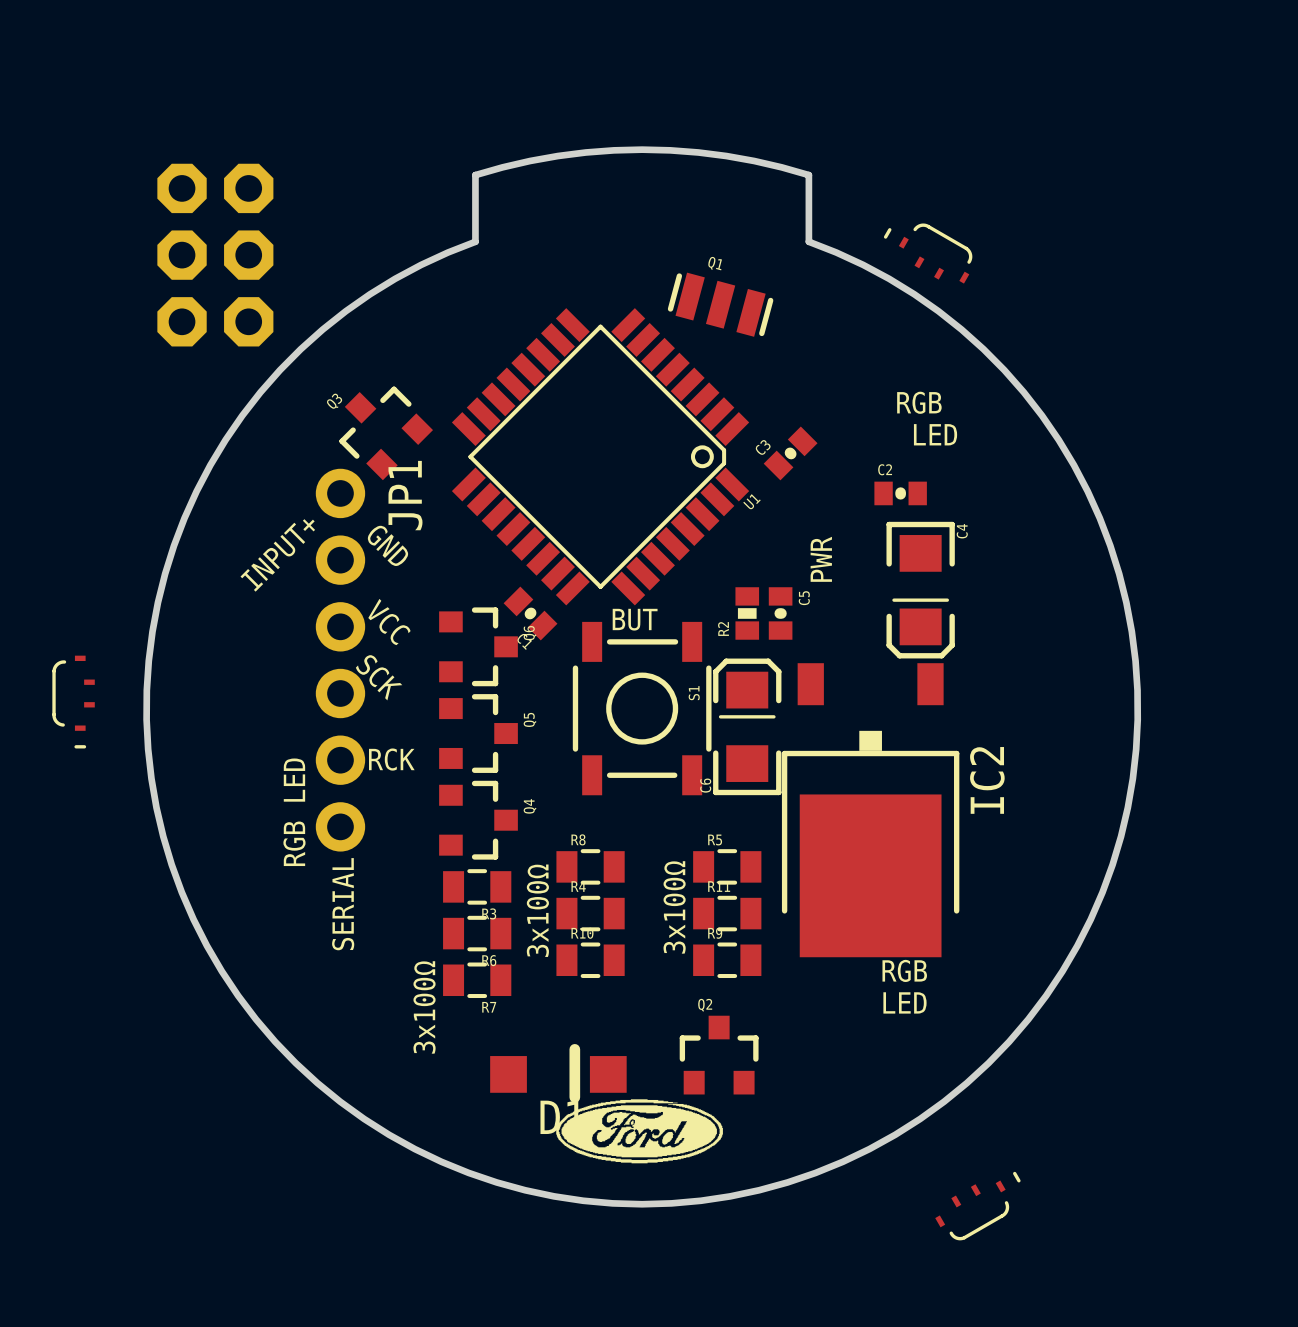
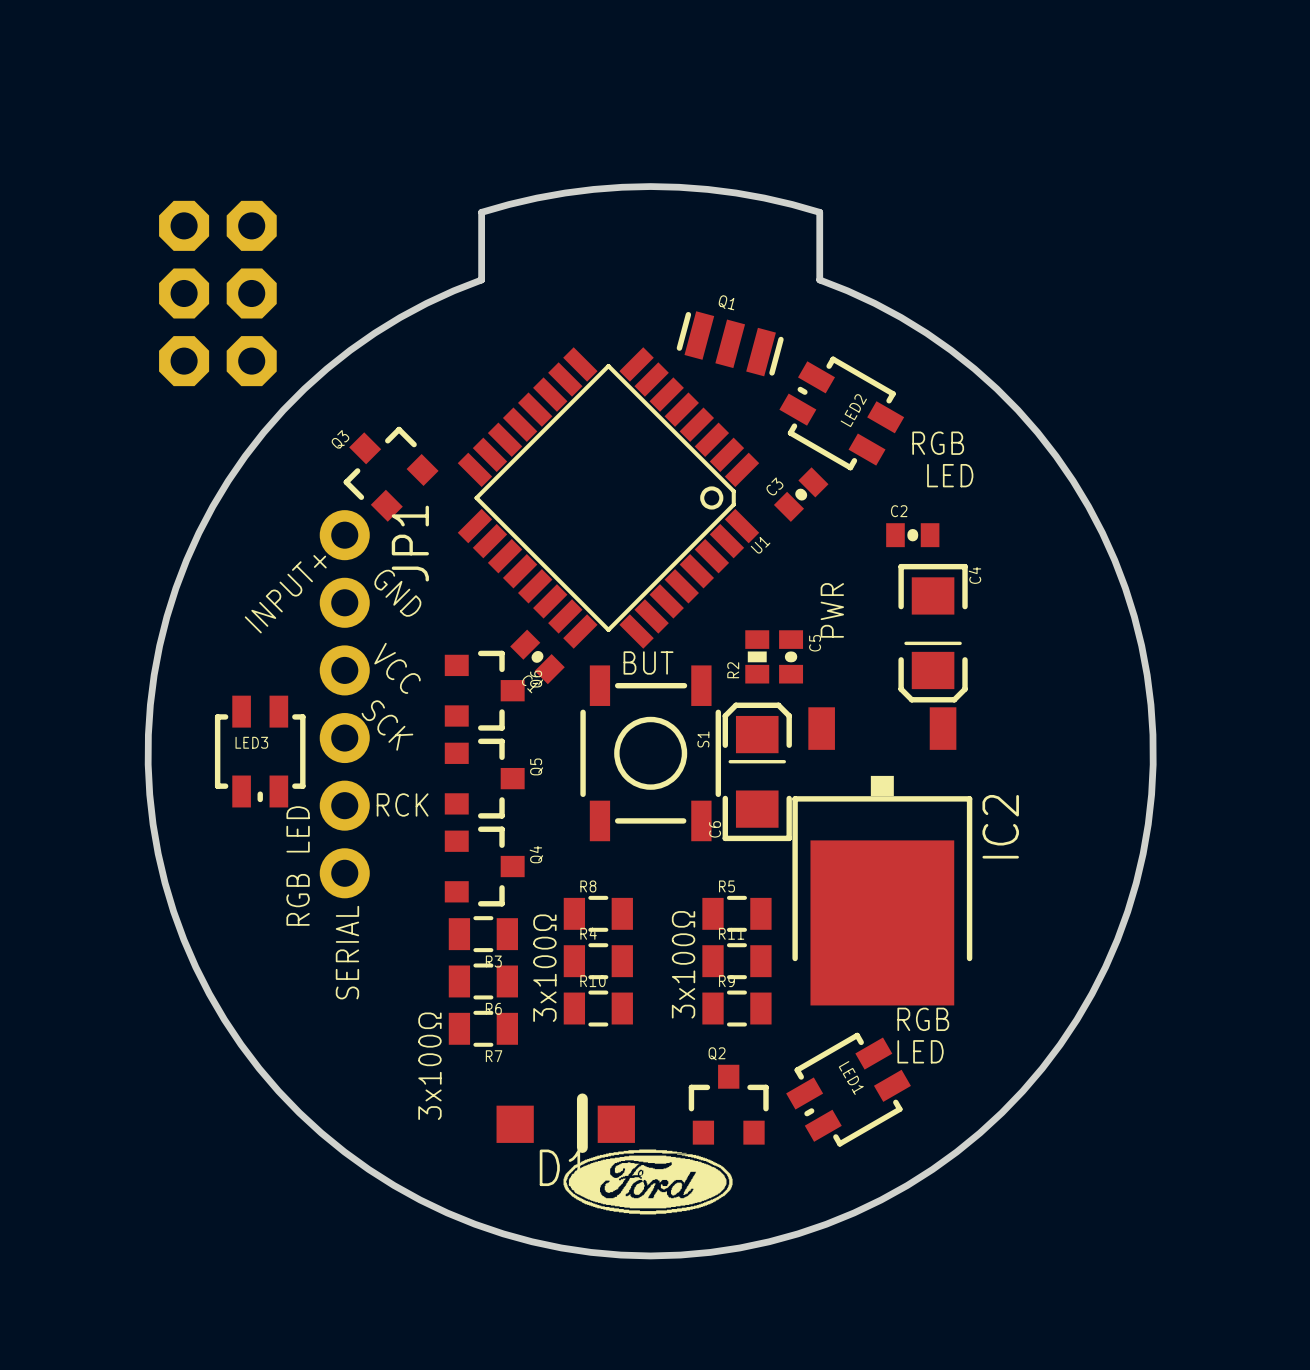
part: (928, 253) -> none
LED2: none -> (841, 413)
part: (73, 702) -> none
LED3: none -> (260, 751)
LED1: none -> (848, 1089)
part: (977, 1206) -> none

